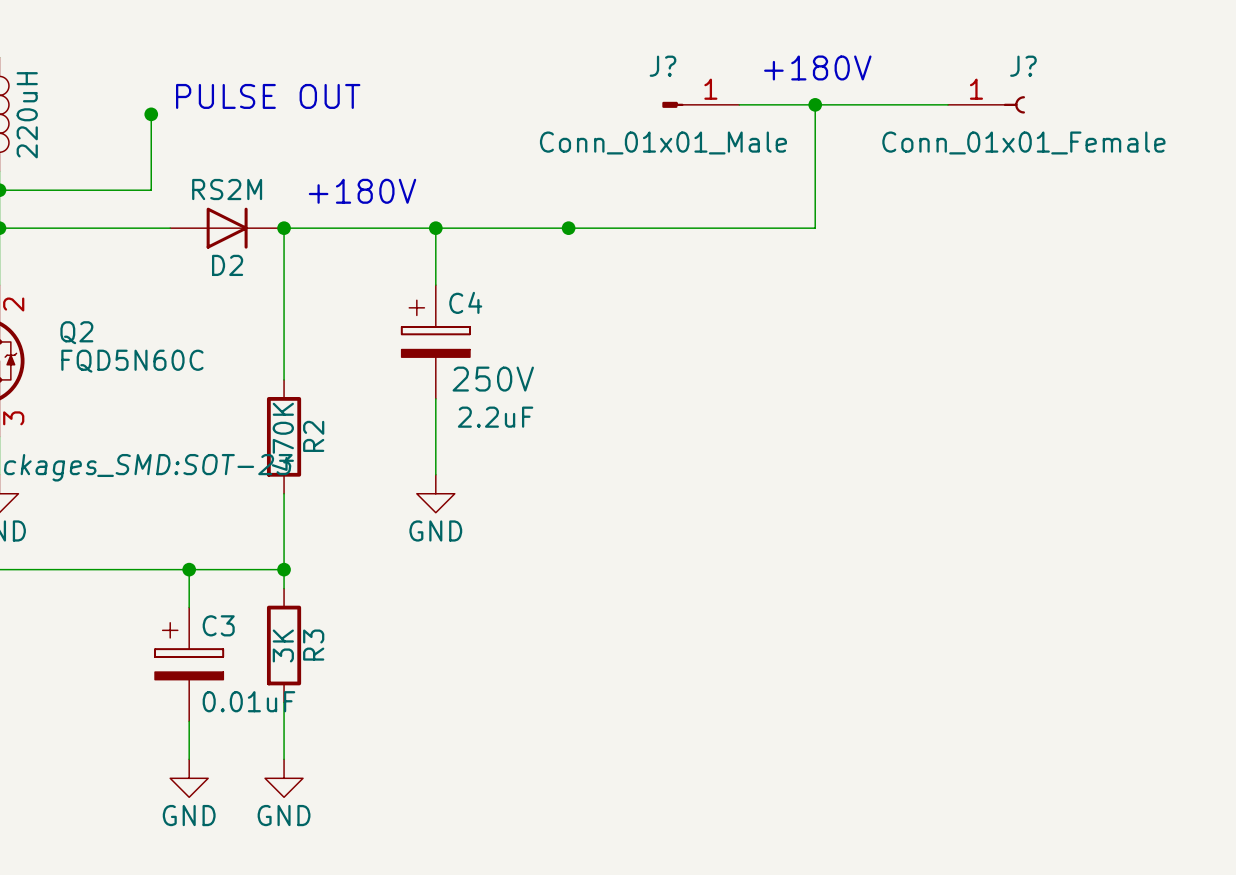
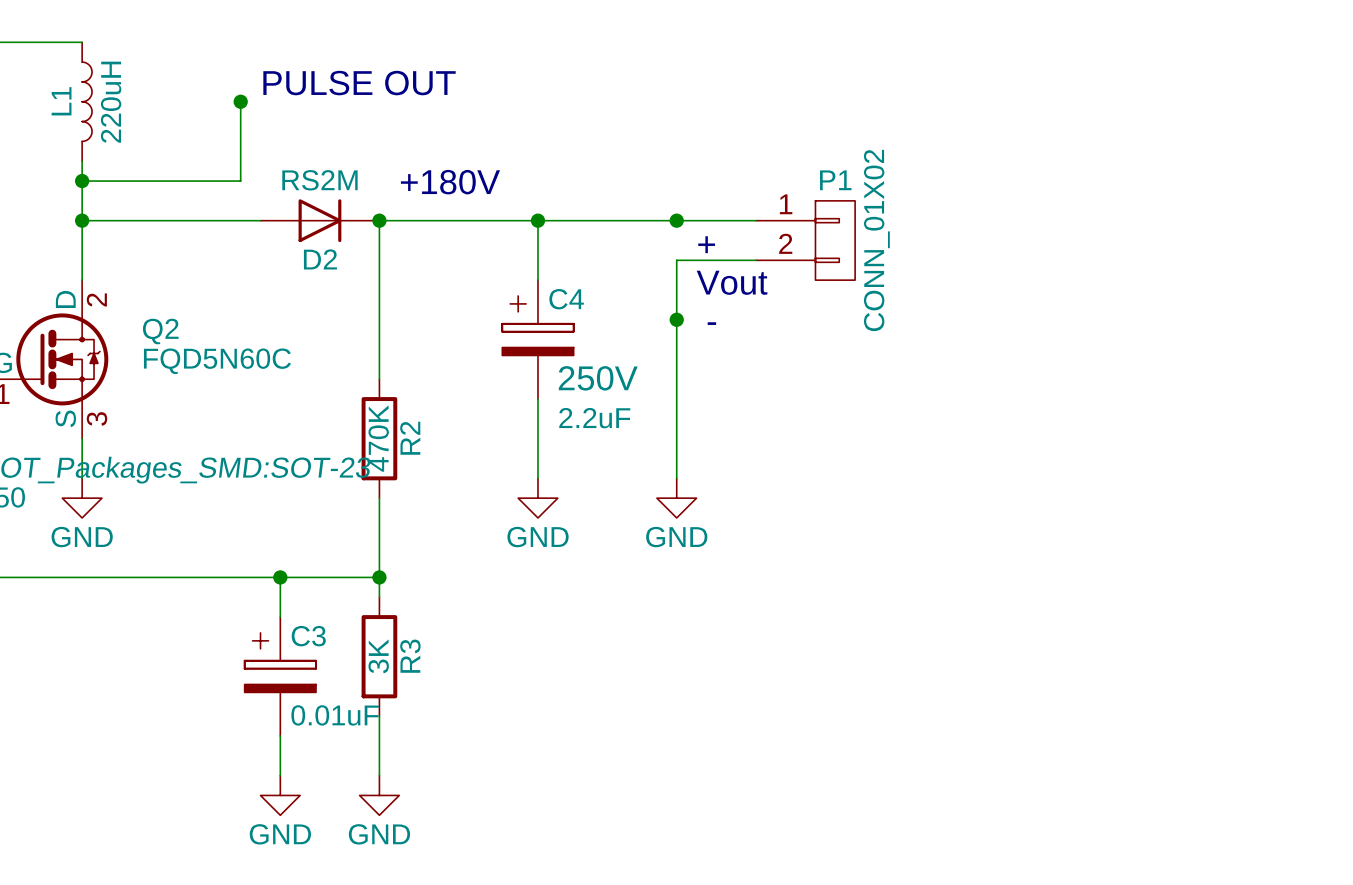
text: +180V (817, 67) -> none
J?: Conn_01x01_Male (700, 104) -> none
wire: (739, 104) (948, 104) -> none
wire: (815, 104) (815, 228) (644, 228) -> none
junction: (815, 104) -> none
J?: Conn_01x01_Female (986, 104) -> none
P1: none -> CONN_01X02 (805, 240)
text: none -> + (706, 244)
wire: none -> (756, 260) (676, 260) (676, 478)
text: none -> Vout (732, 282)
junction: none -> (676, 319)
text: none -> - (711, 323)
power symbol: none -> GND (676, 498)

